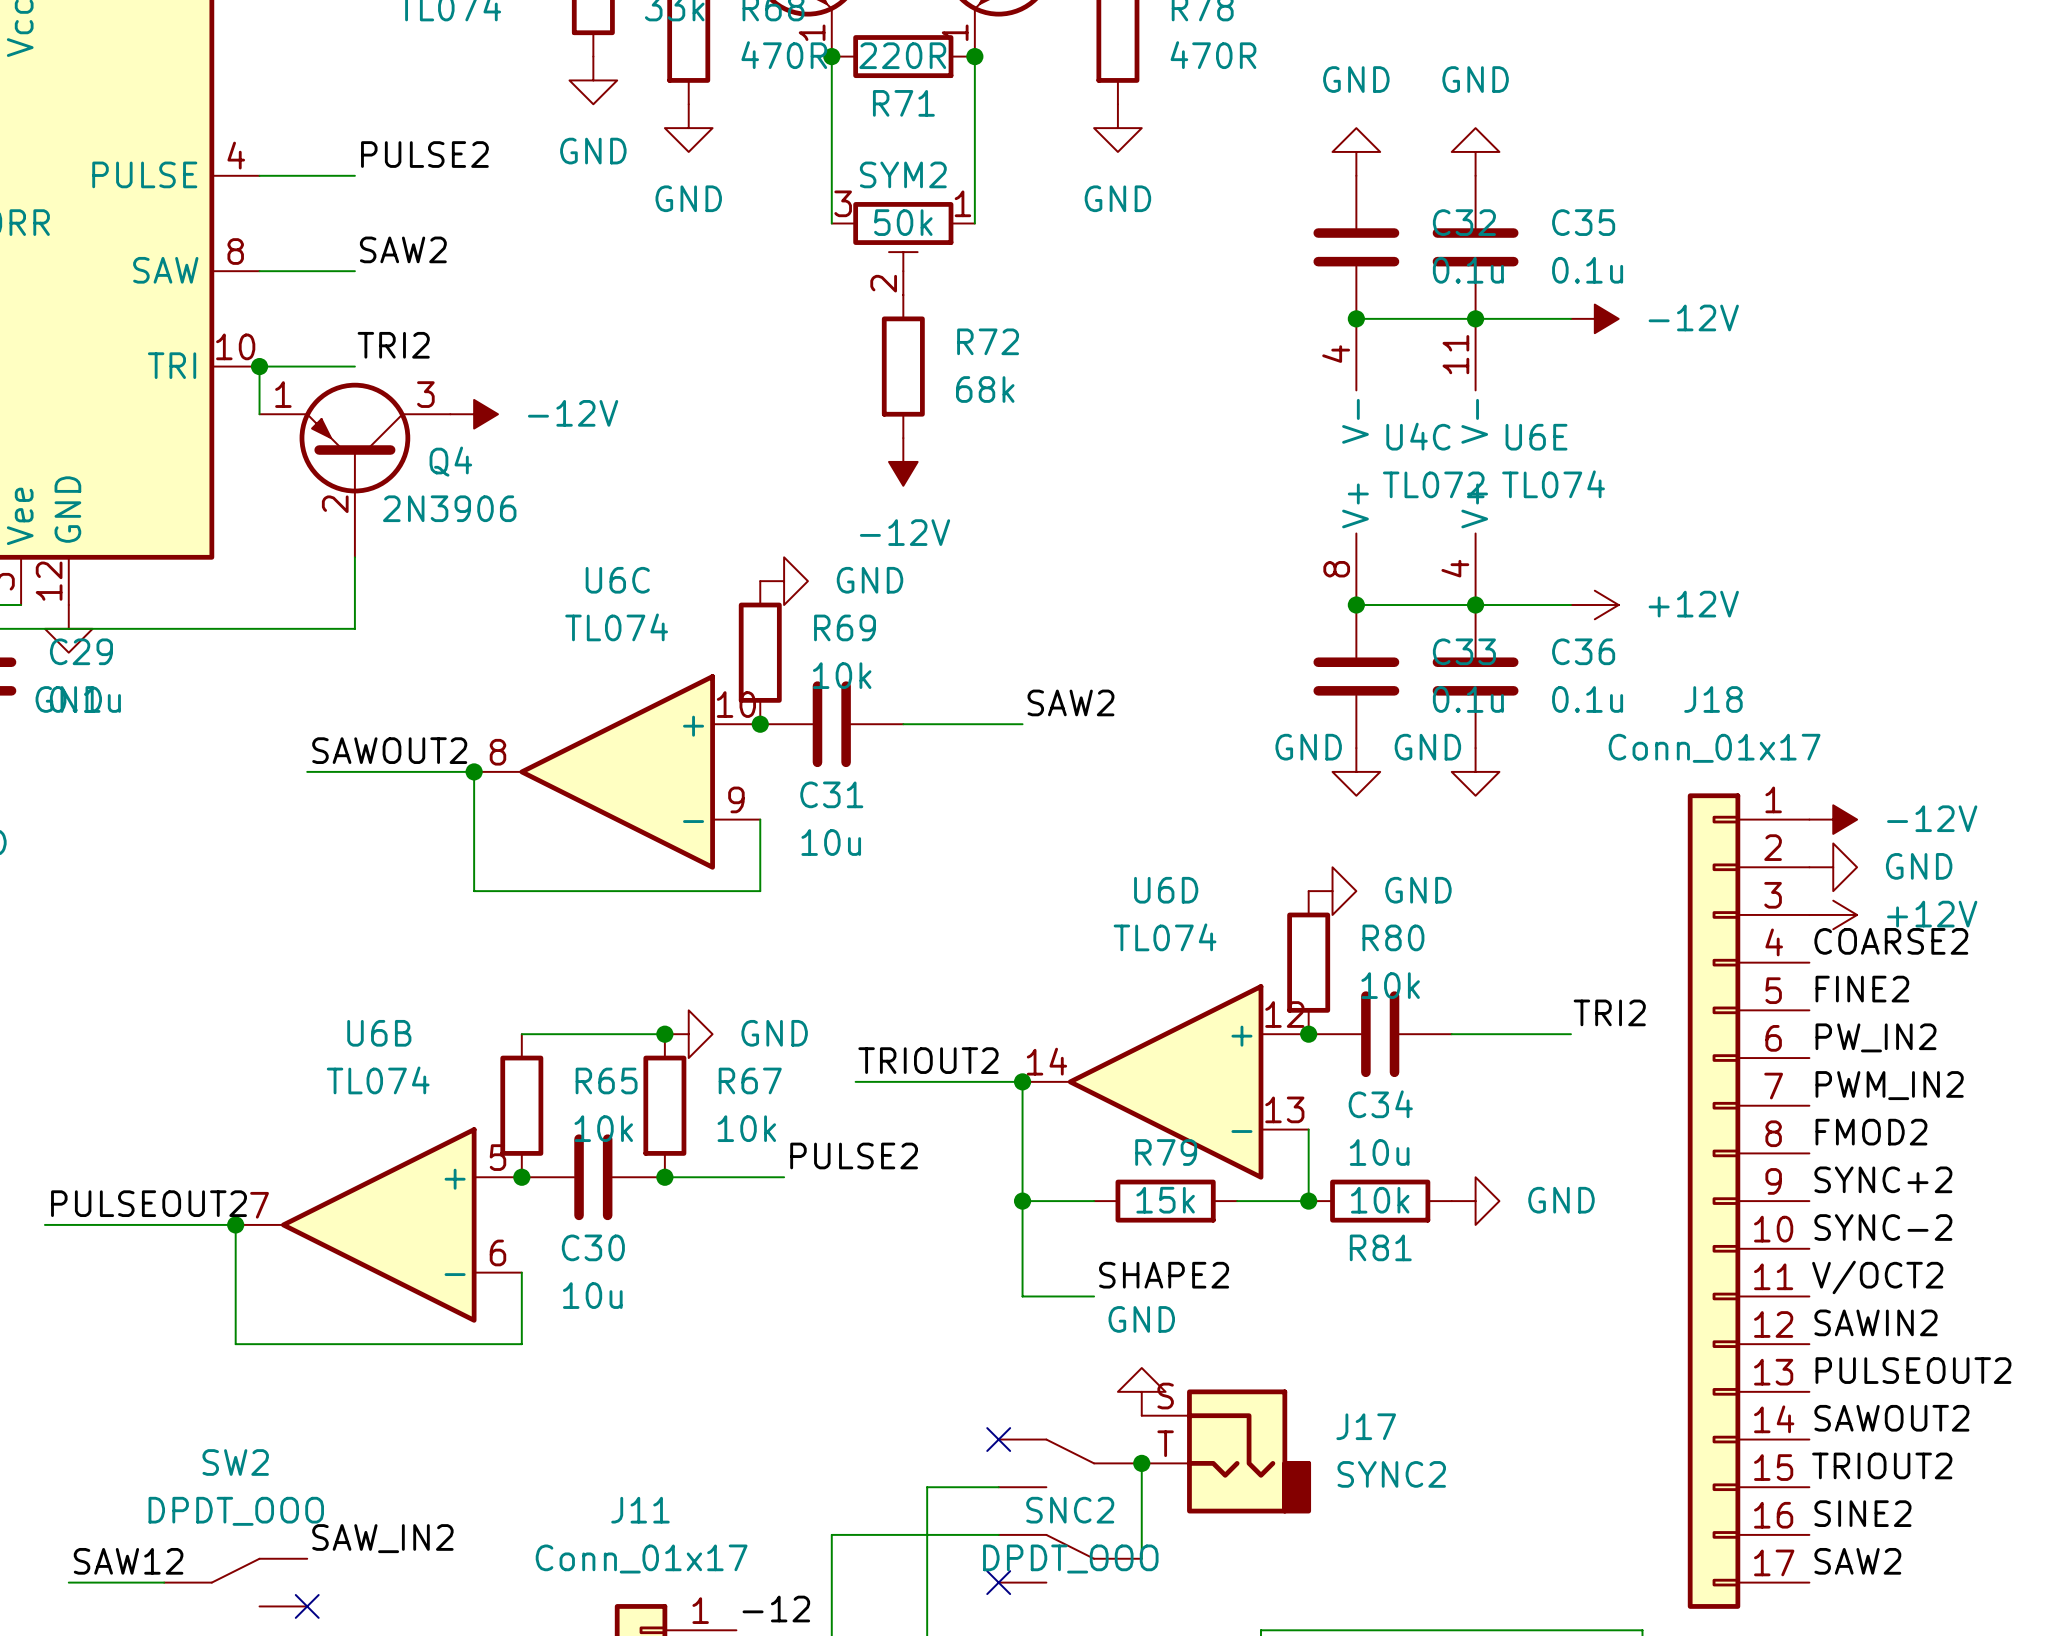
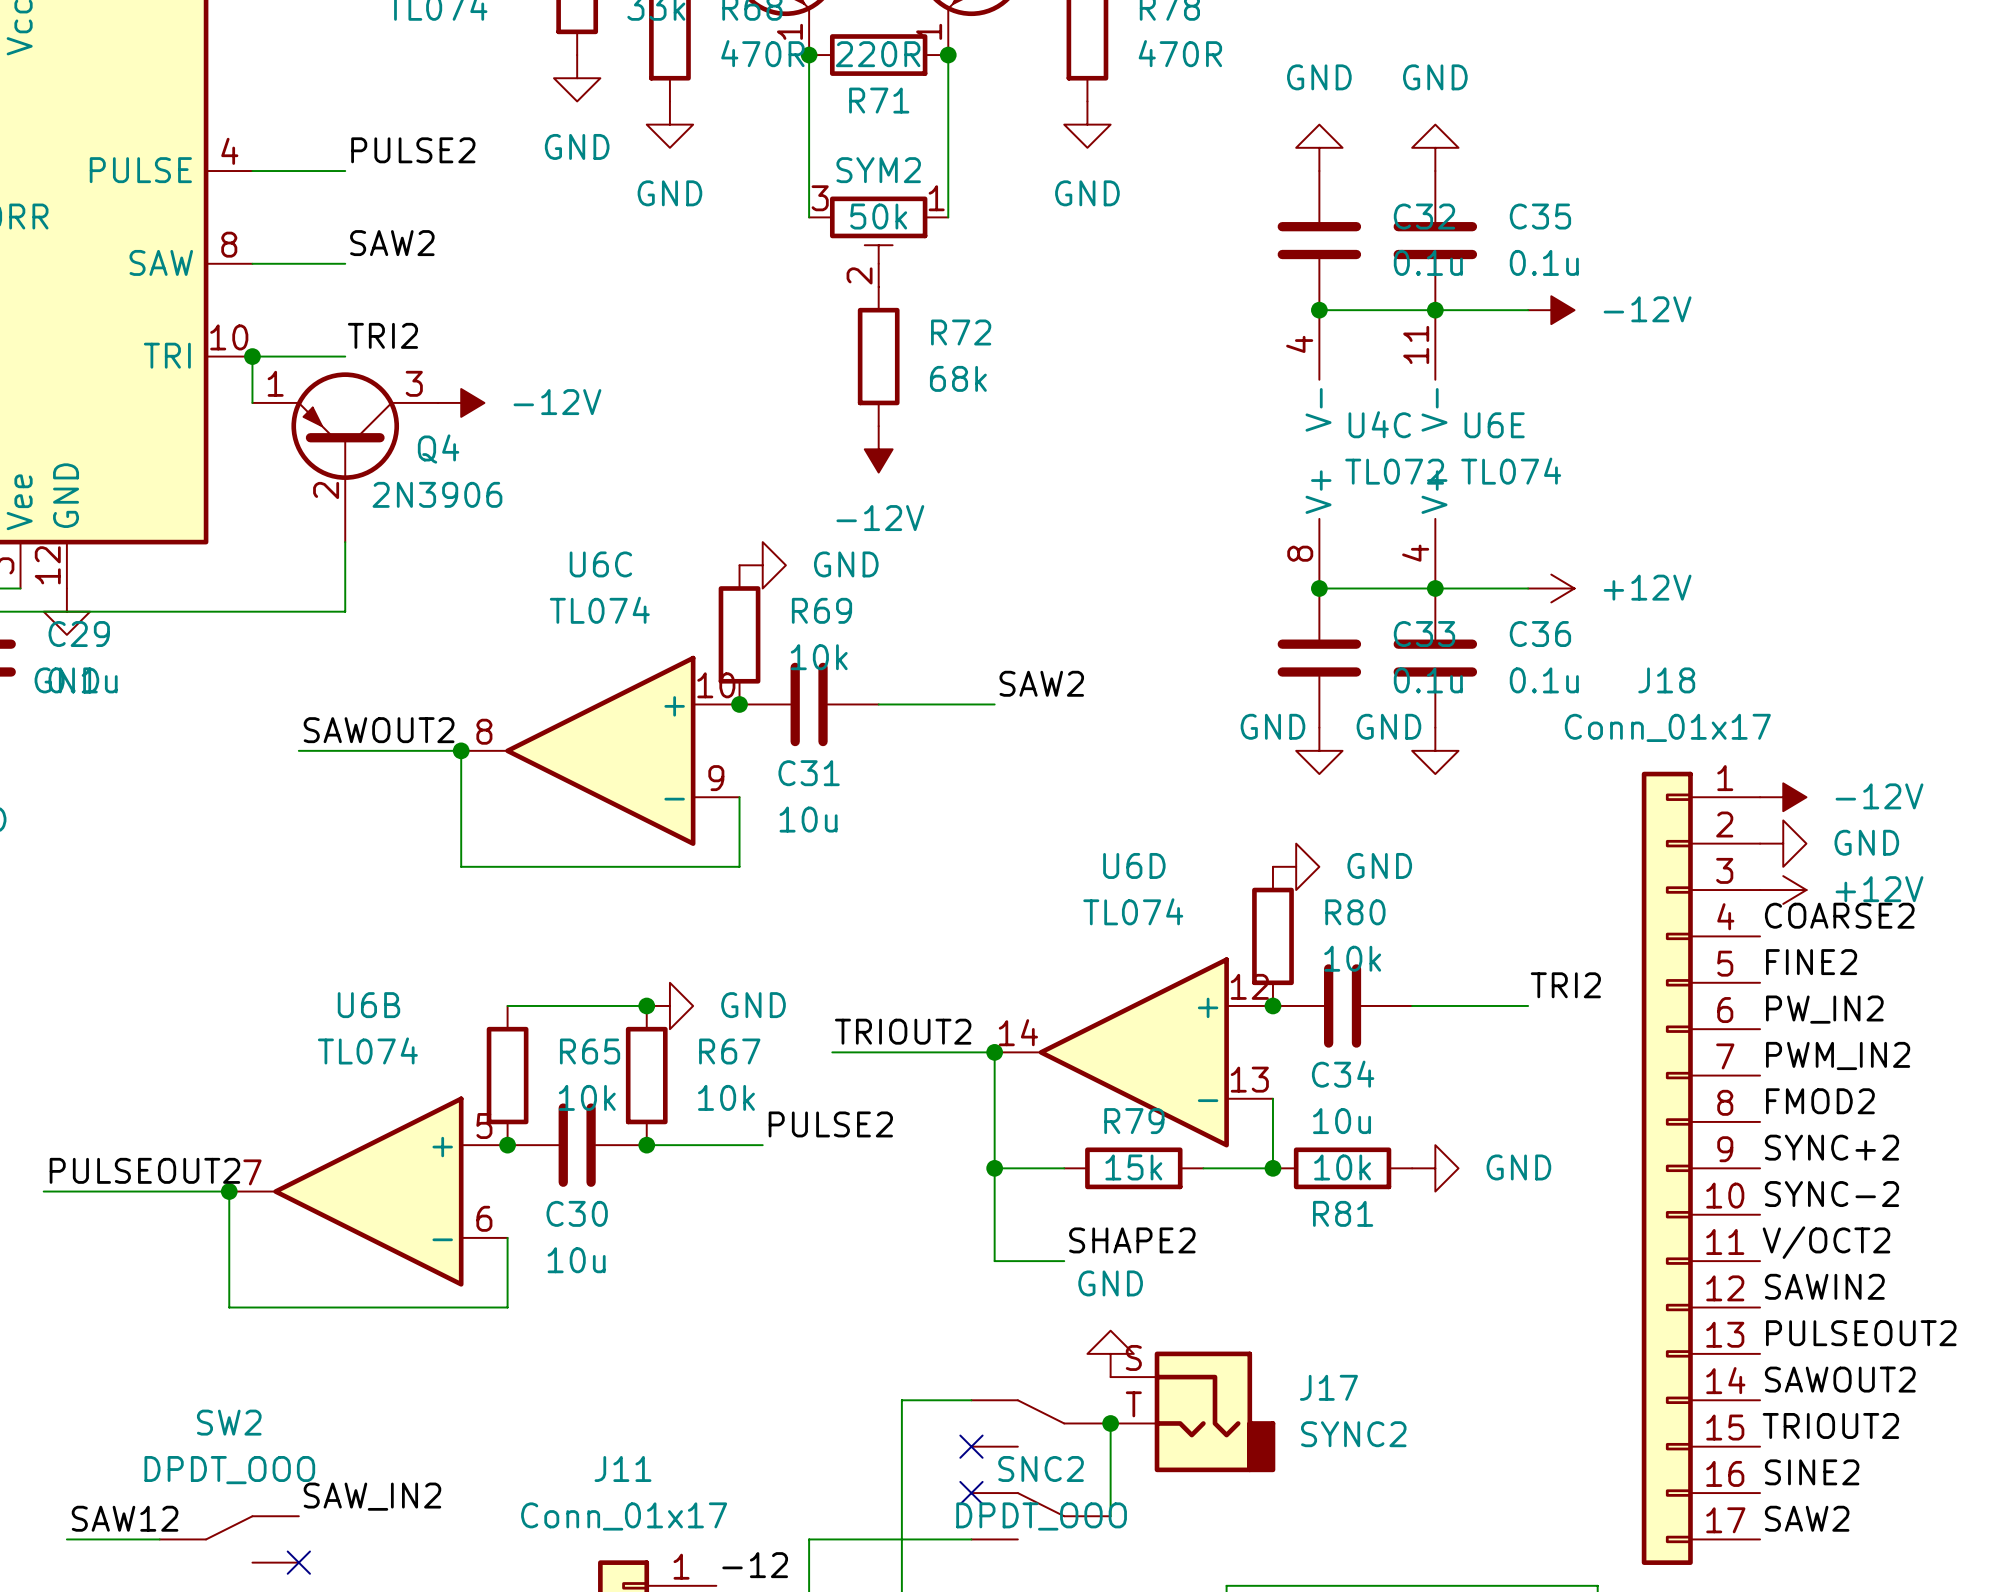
no-connect mark: (998, 1439) -> none
wire: (927, 1487) (998, 1487) -> (901, 1446) (901, 1400) (971, 1400)
no-connect mark: none -> (971, 1446)
wire: (998, 1534) (831, 1534) (831, 1582) -> (971, 1539) (809, 1539)
no-connect mark: none -> (971, 1493)
no-connect mark: (998, 1582) -> none

